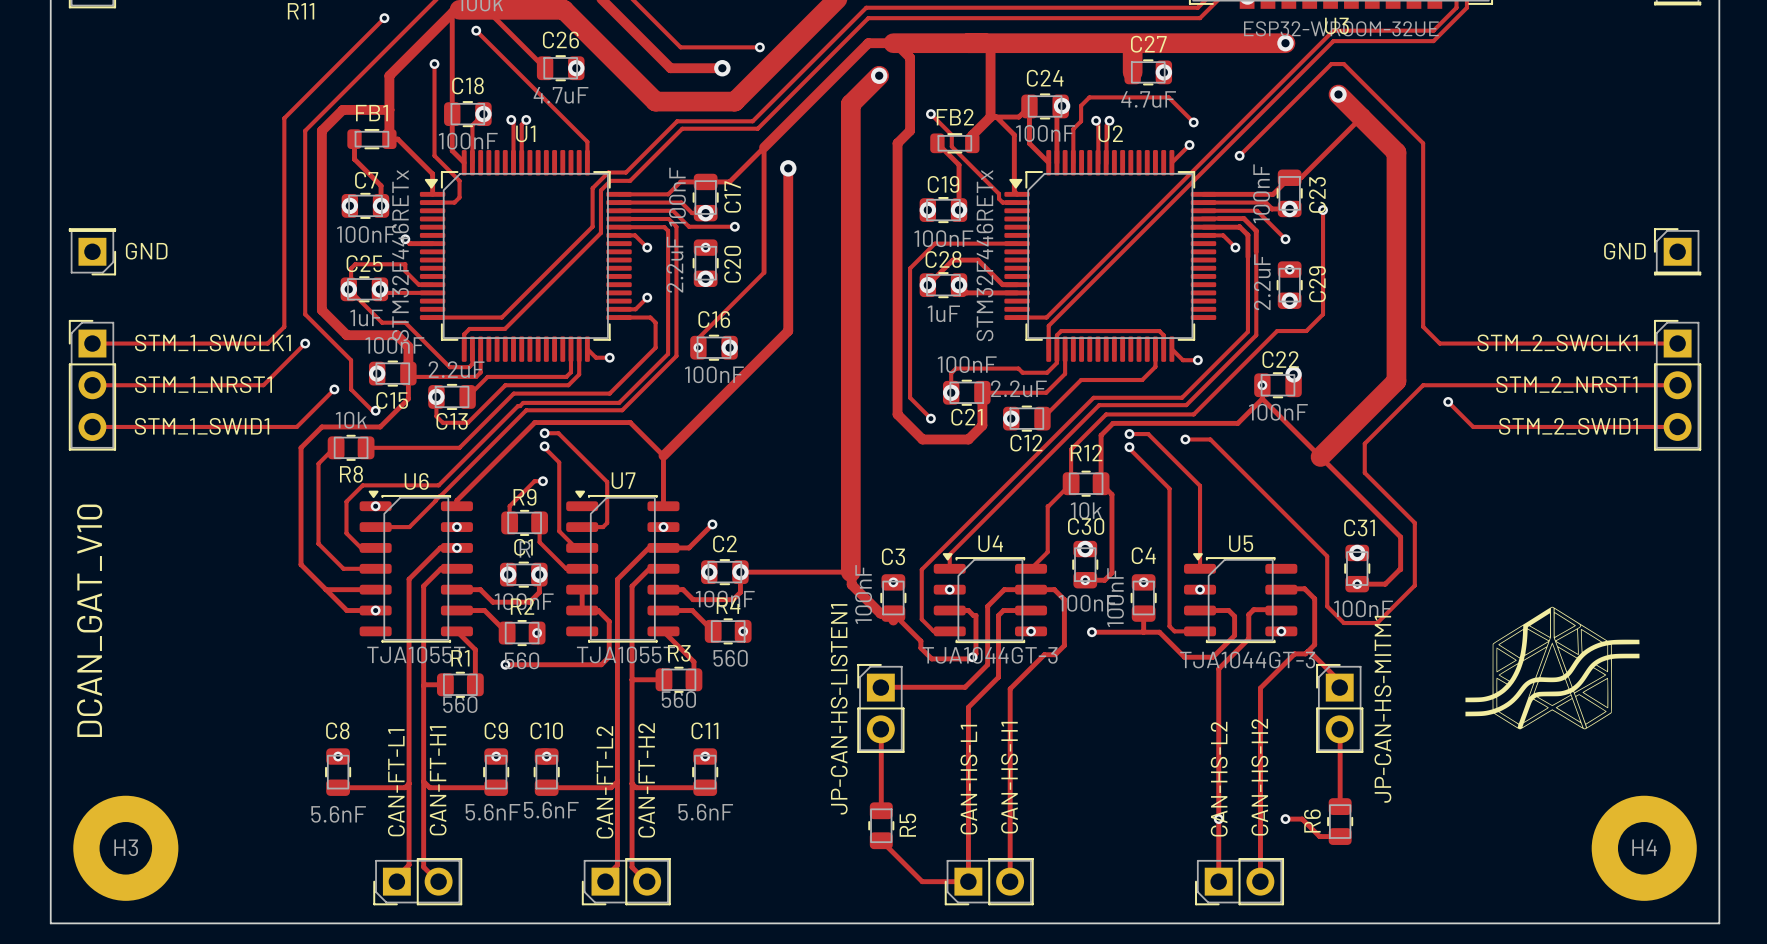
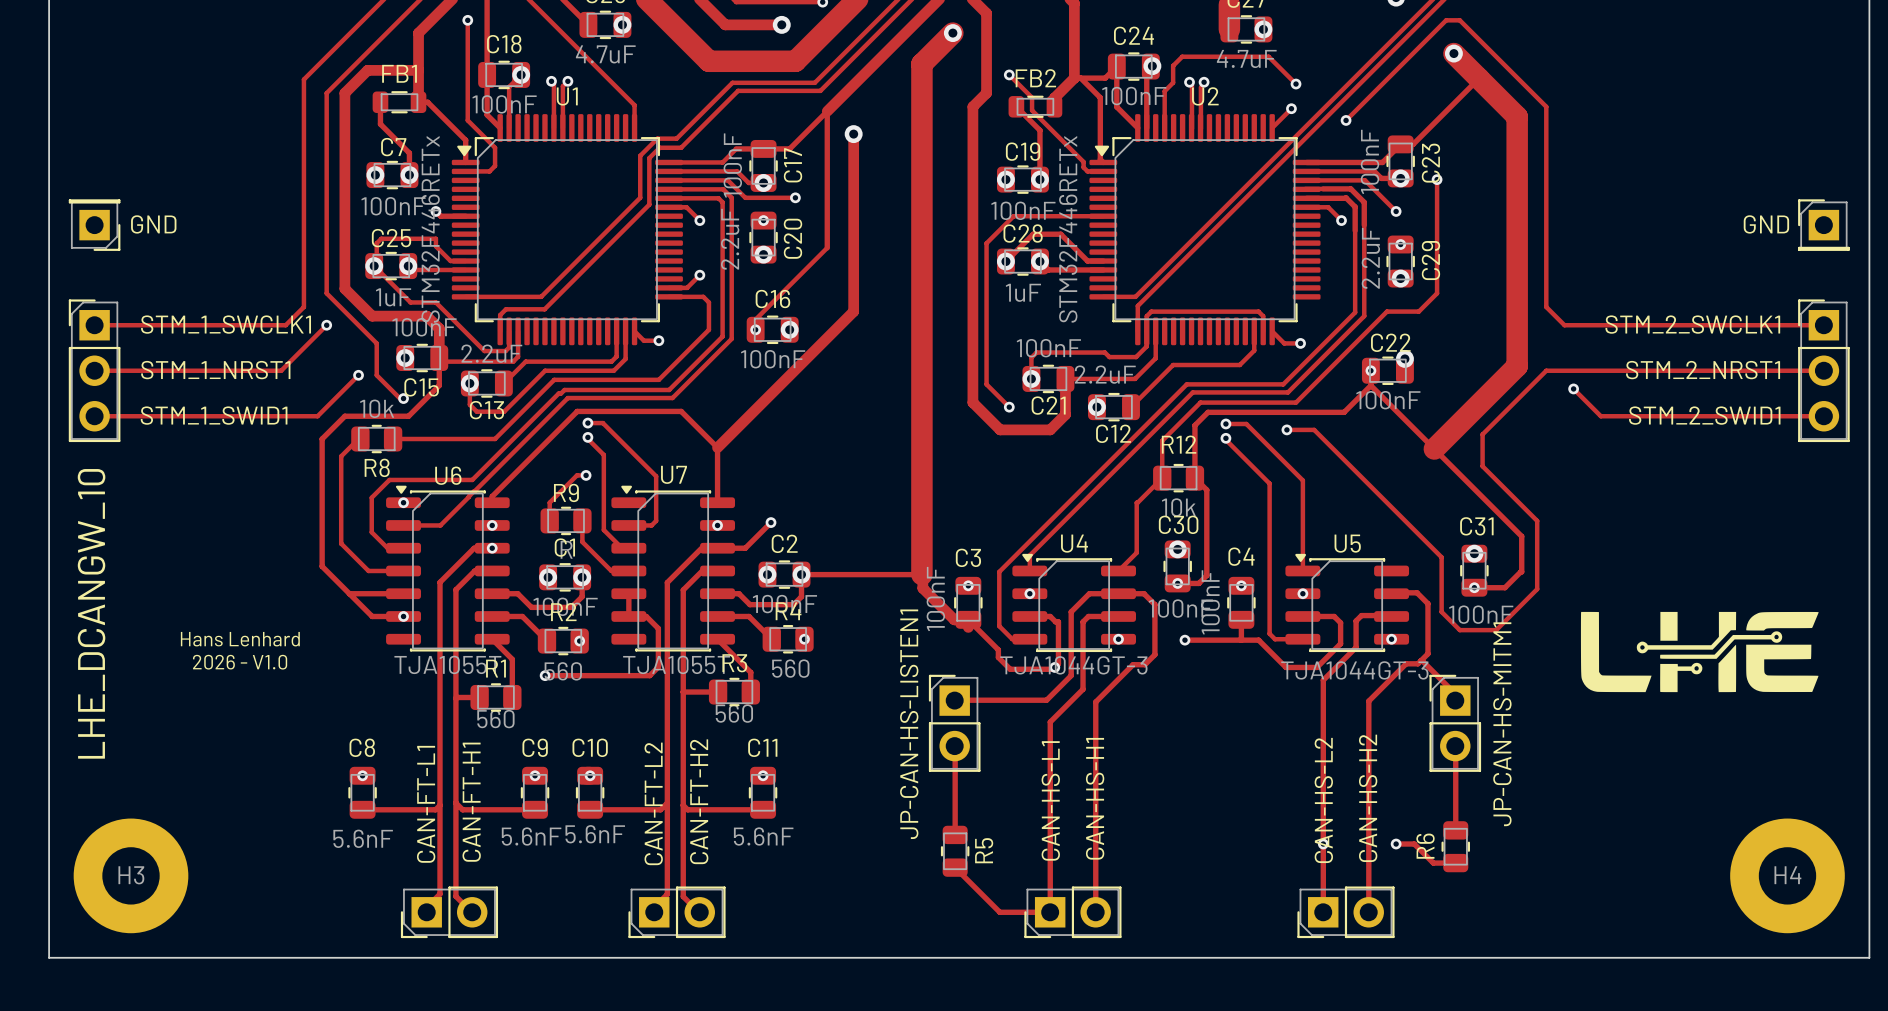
drawing: none -> [1580, 611, 1819, 693]
drawing: [1465, 606, 1640, 730] -> none
text: none -> LHE_DCANGW_10 (91, 613)
text: DCAN_GAT_V10 (89, 620) -> none
text: none -> Hans Lenhard (240, 639)
text: none -> 2026 - V1.0 (240, 662)

